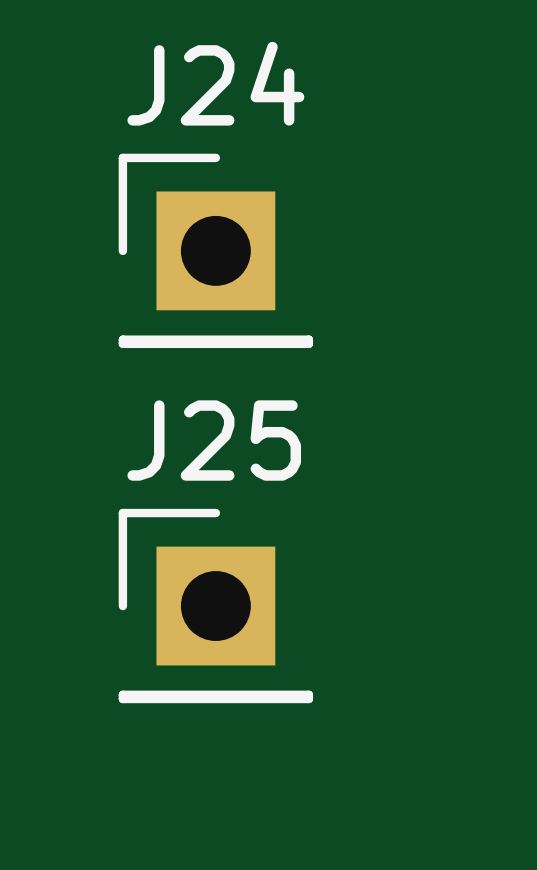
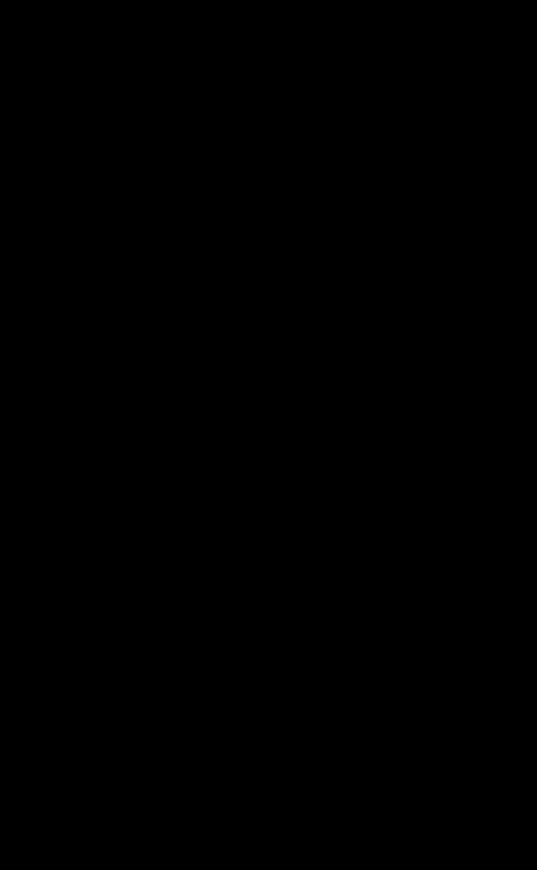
J24: (215, 250) -> none
J25: (215, 606) -> none

